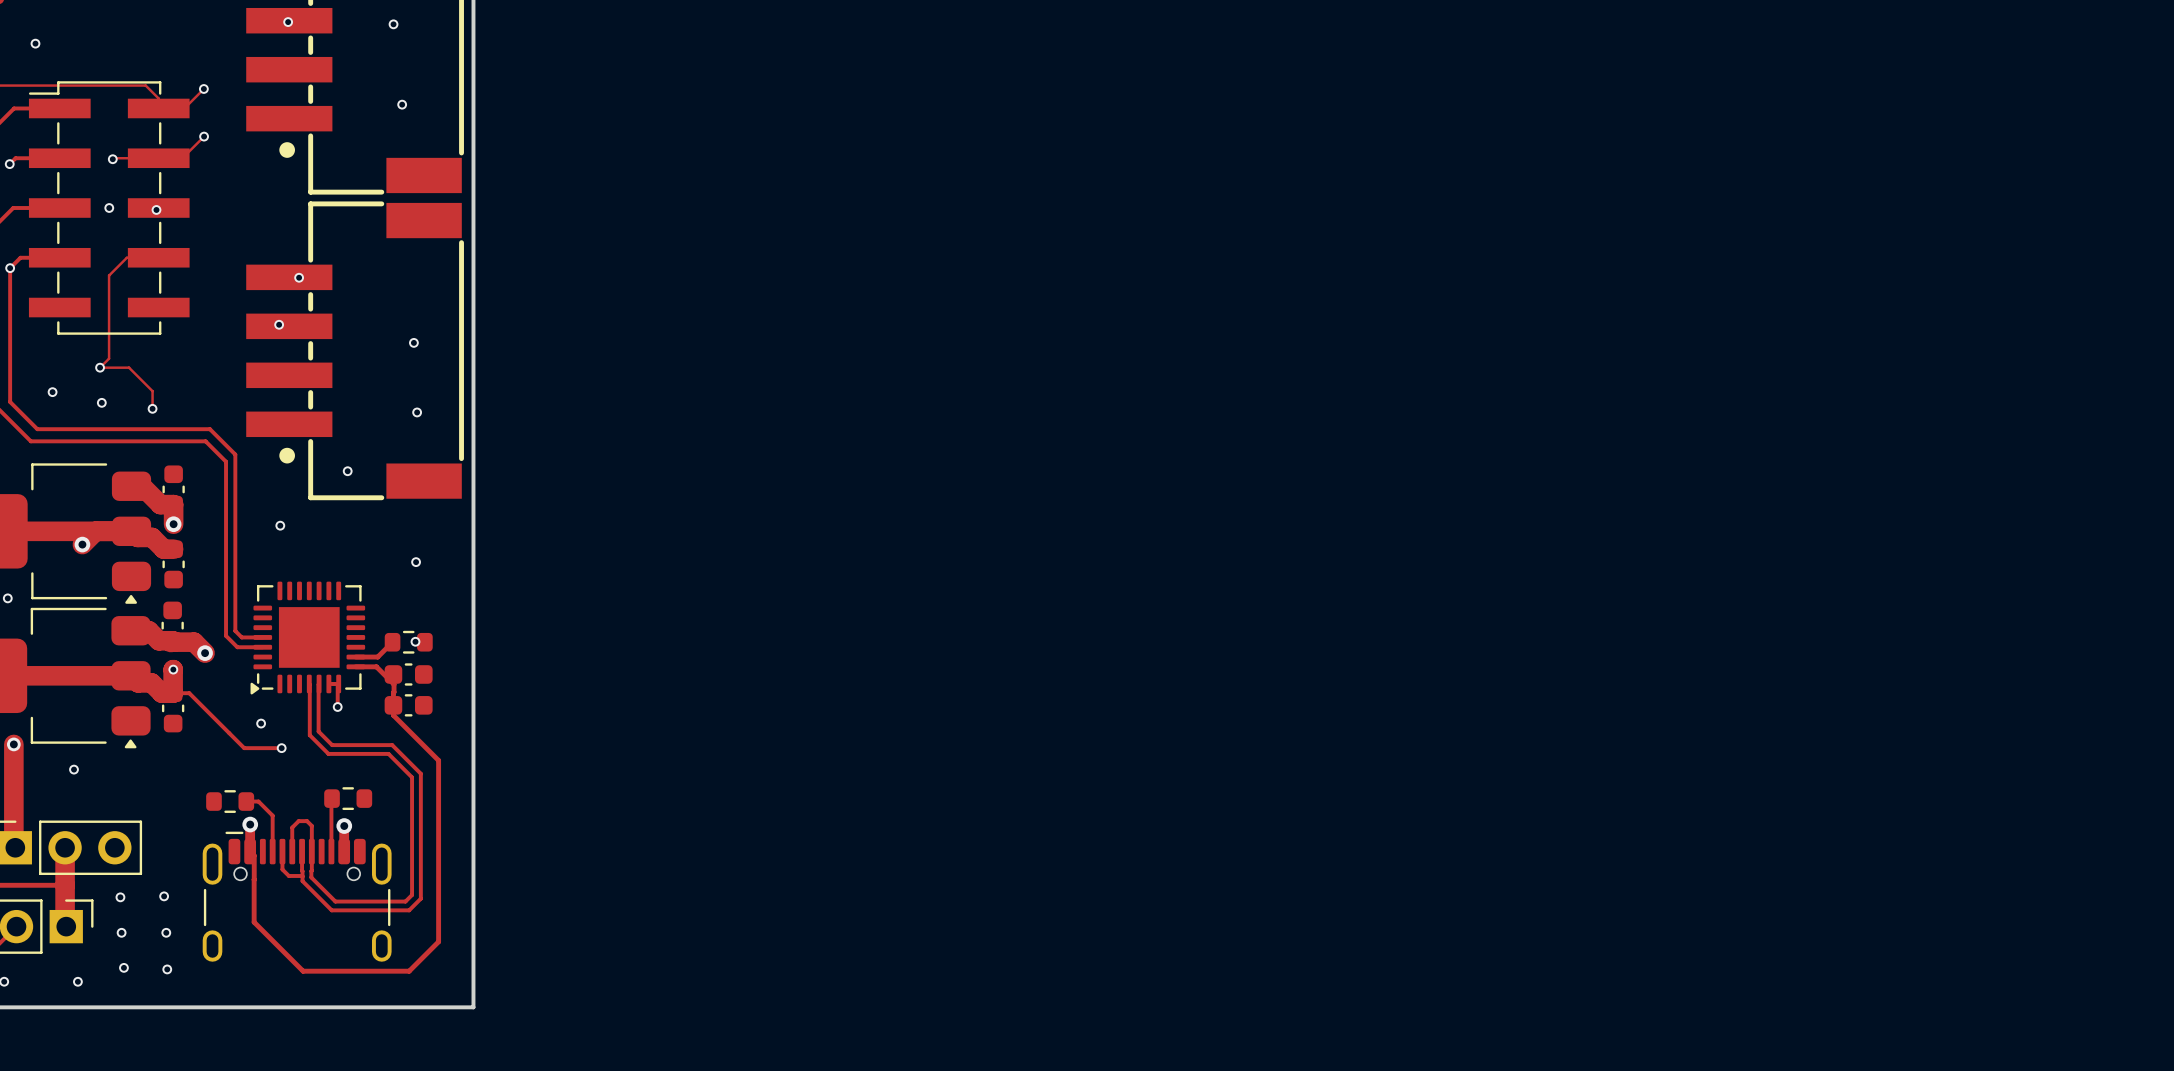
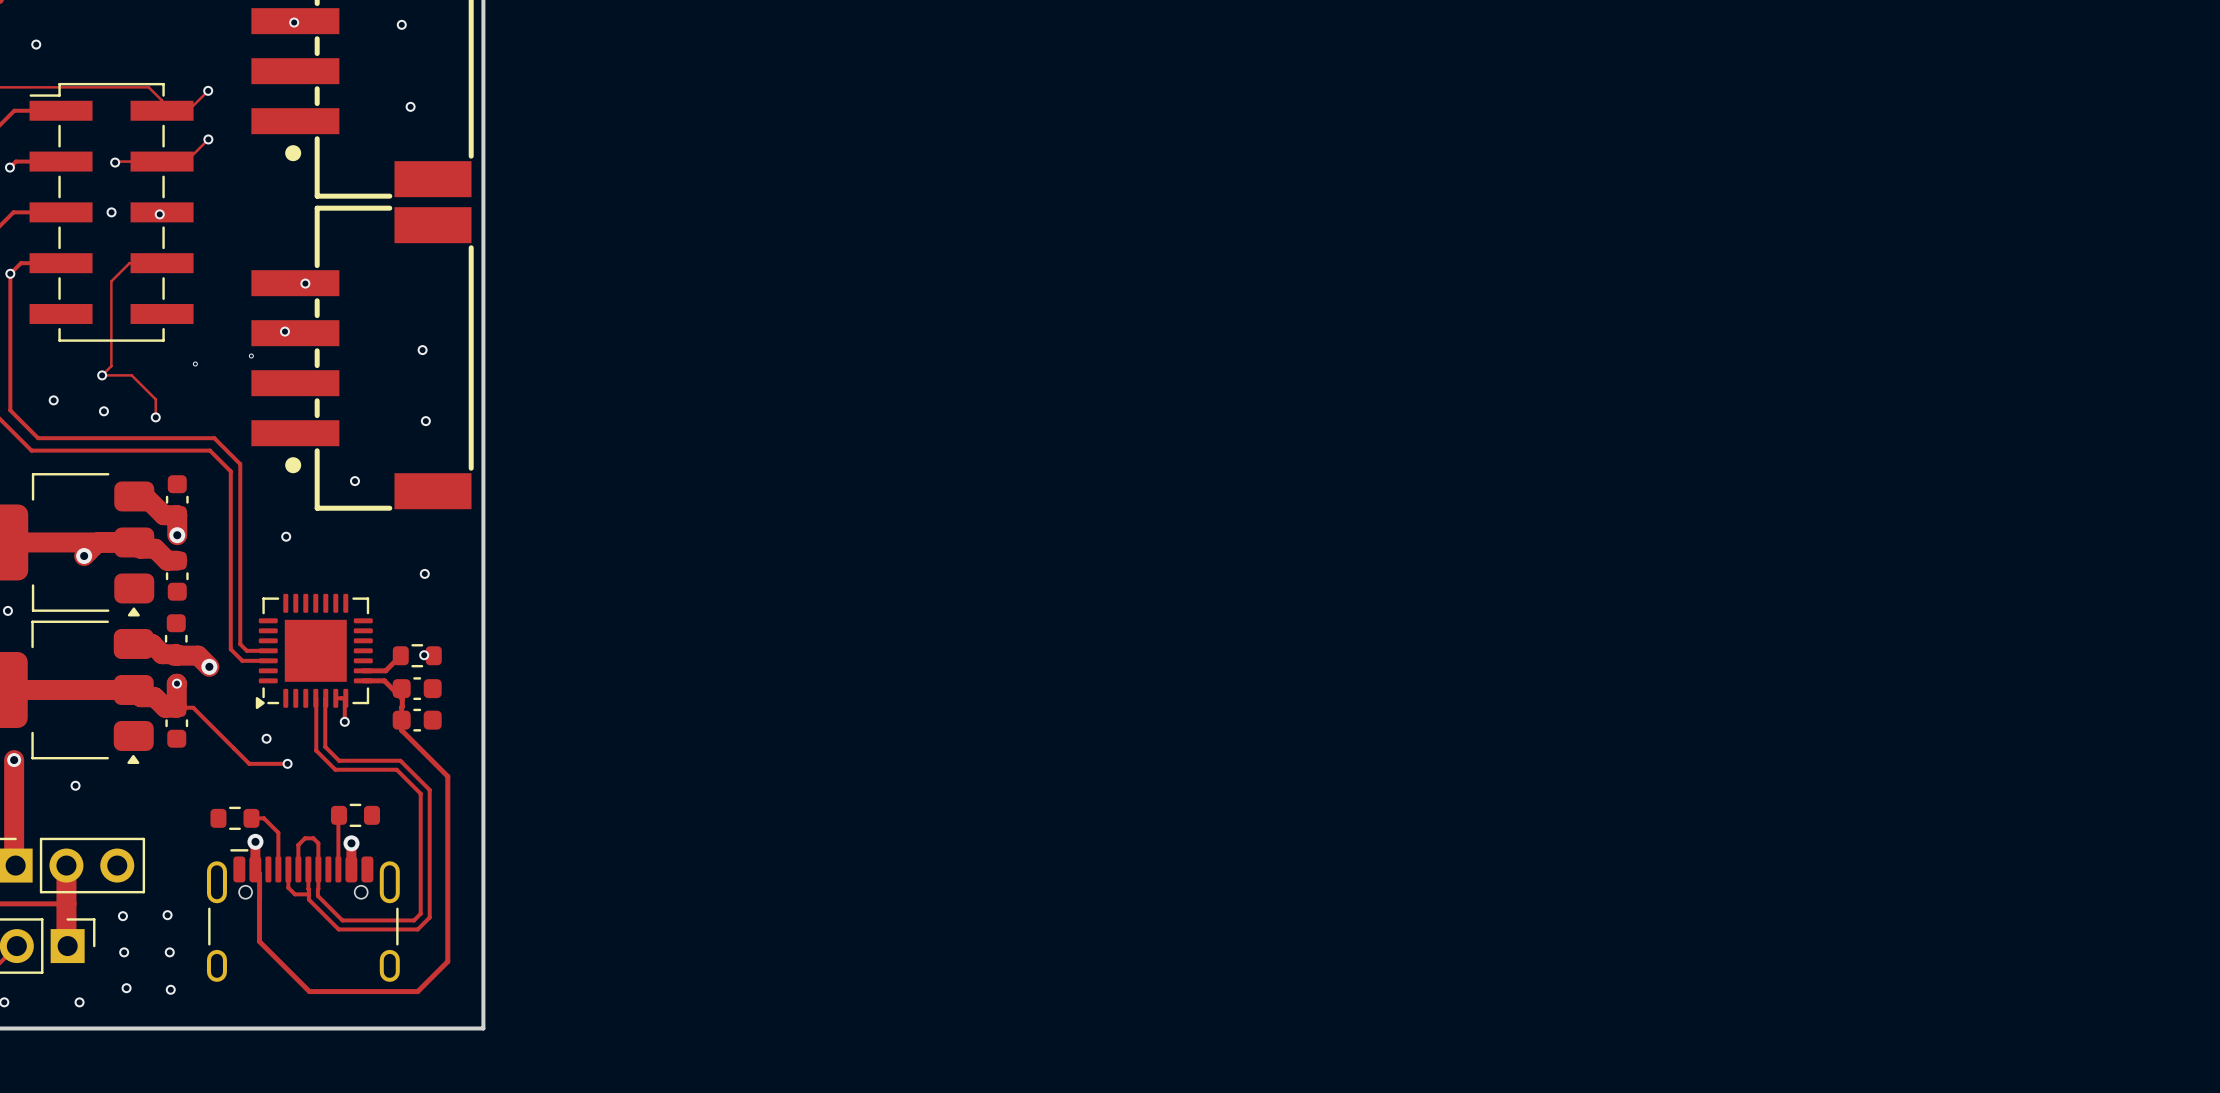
via: none -> (251, 355)
via: none -> (195, 363)

